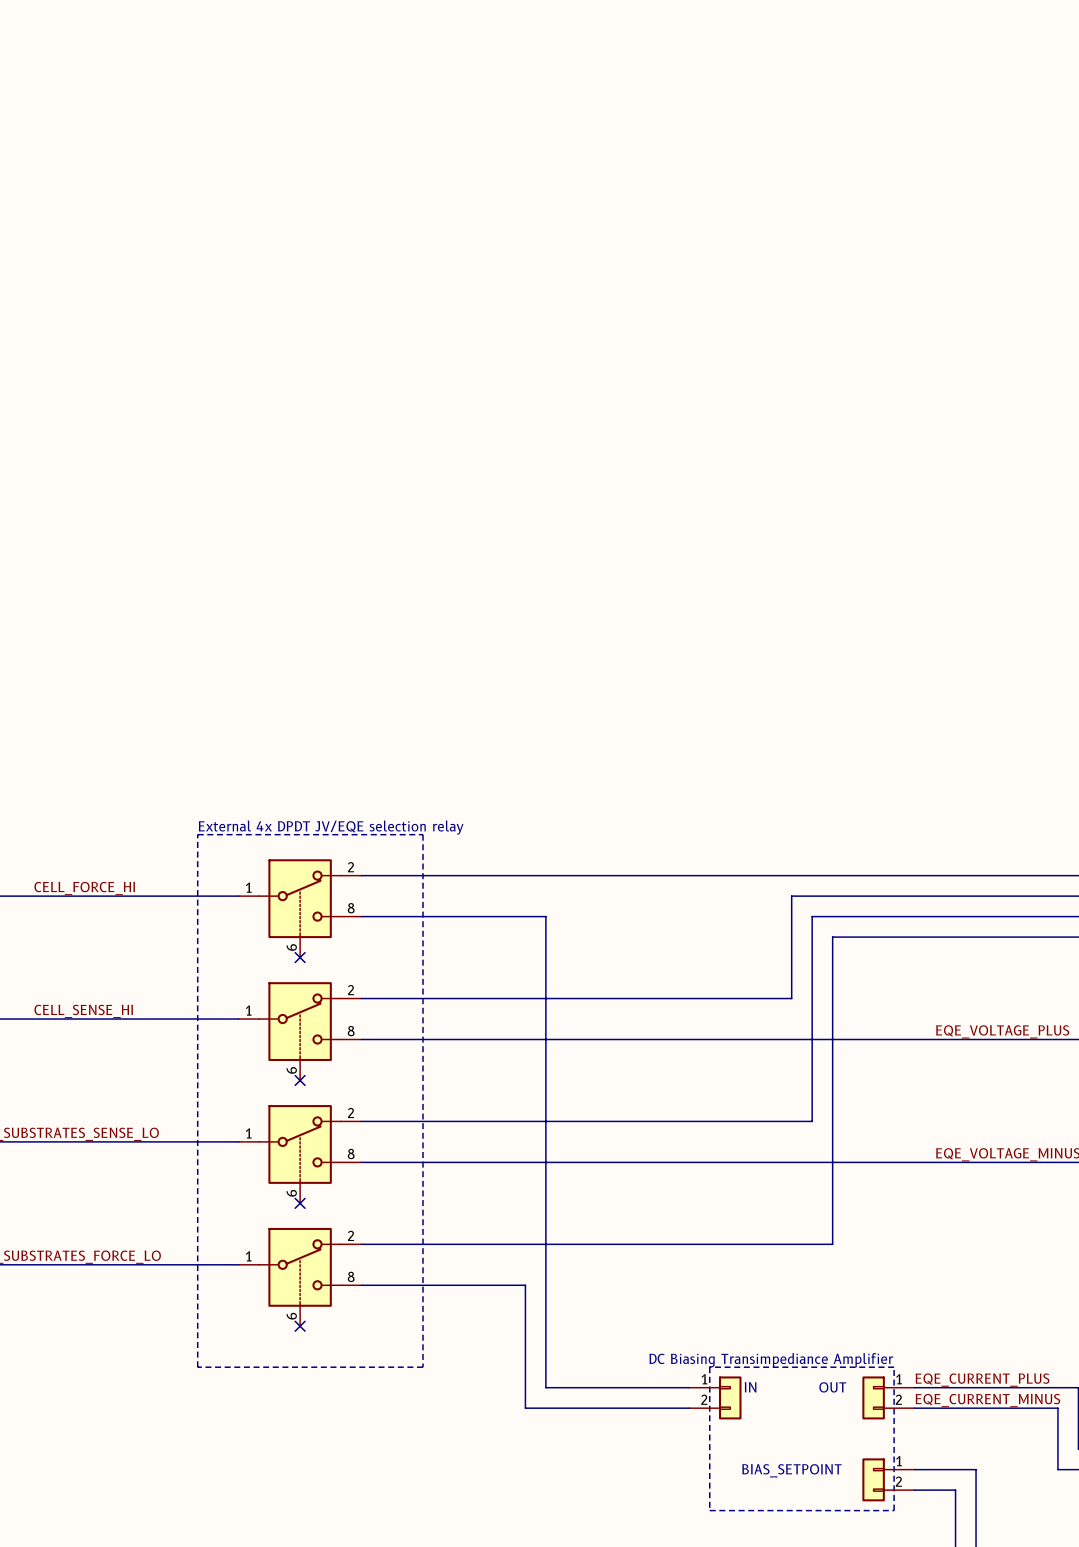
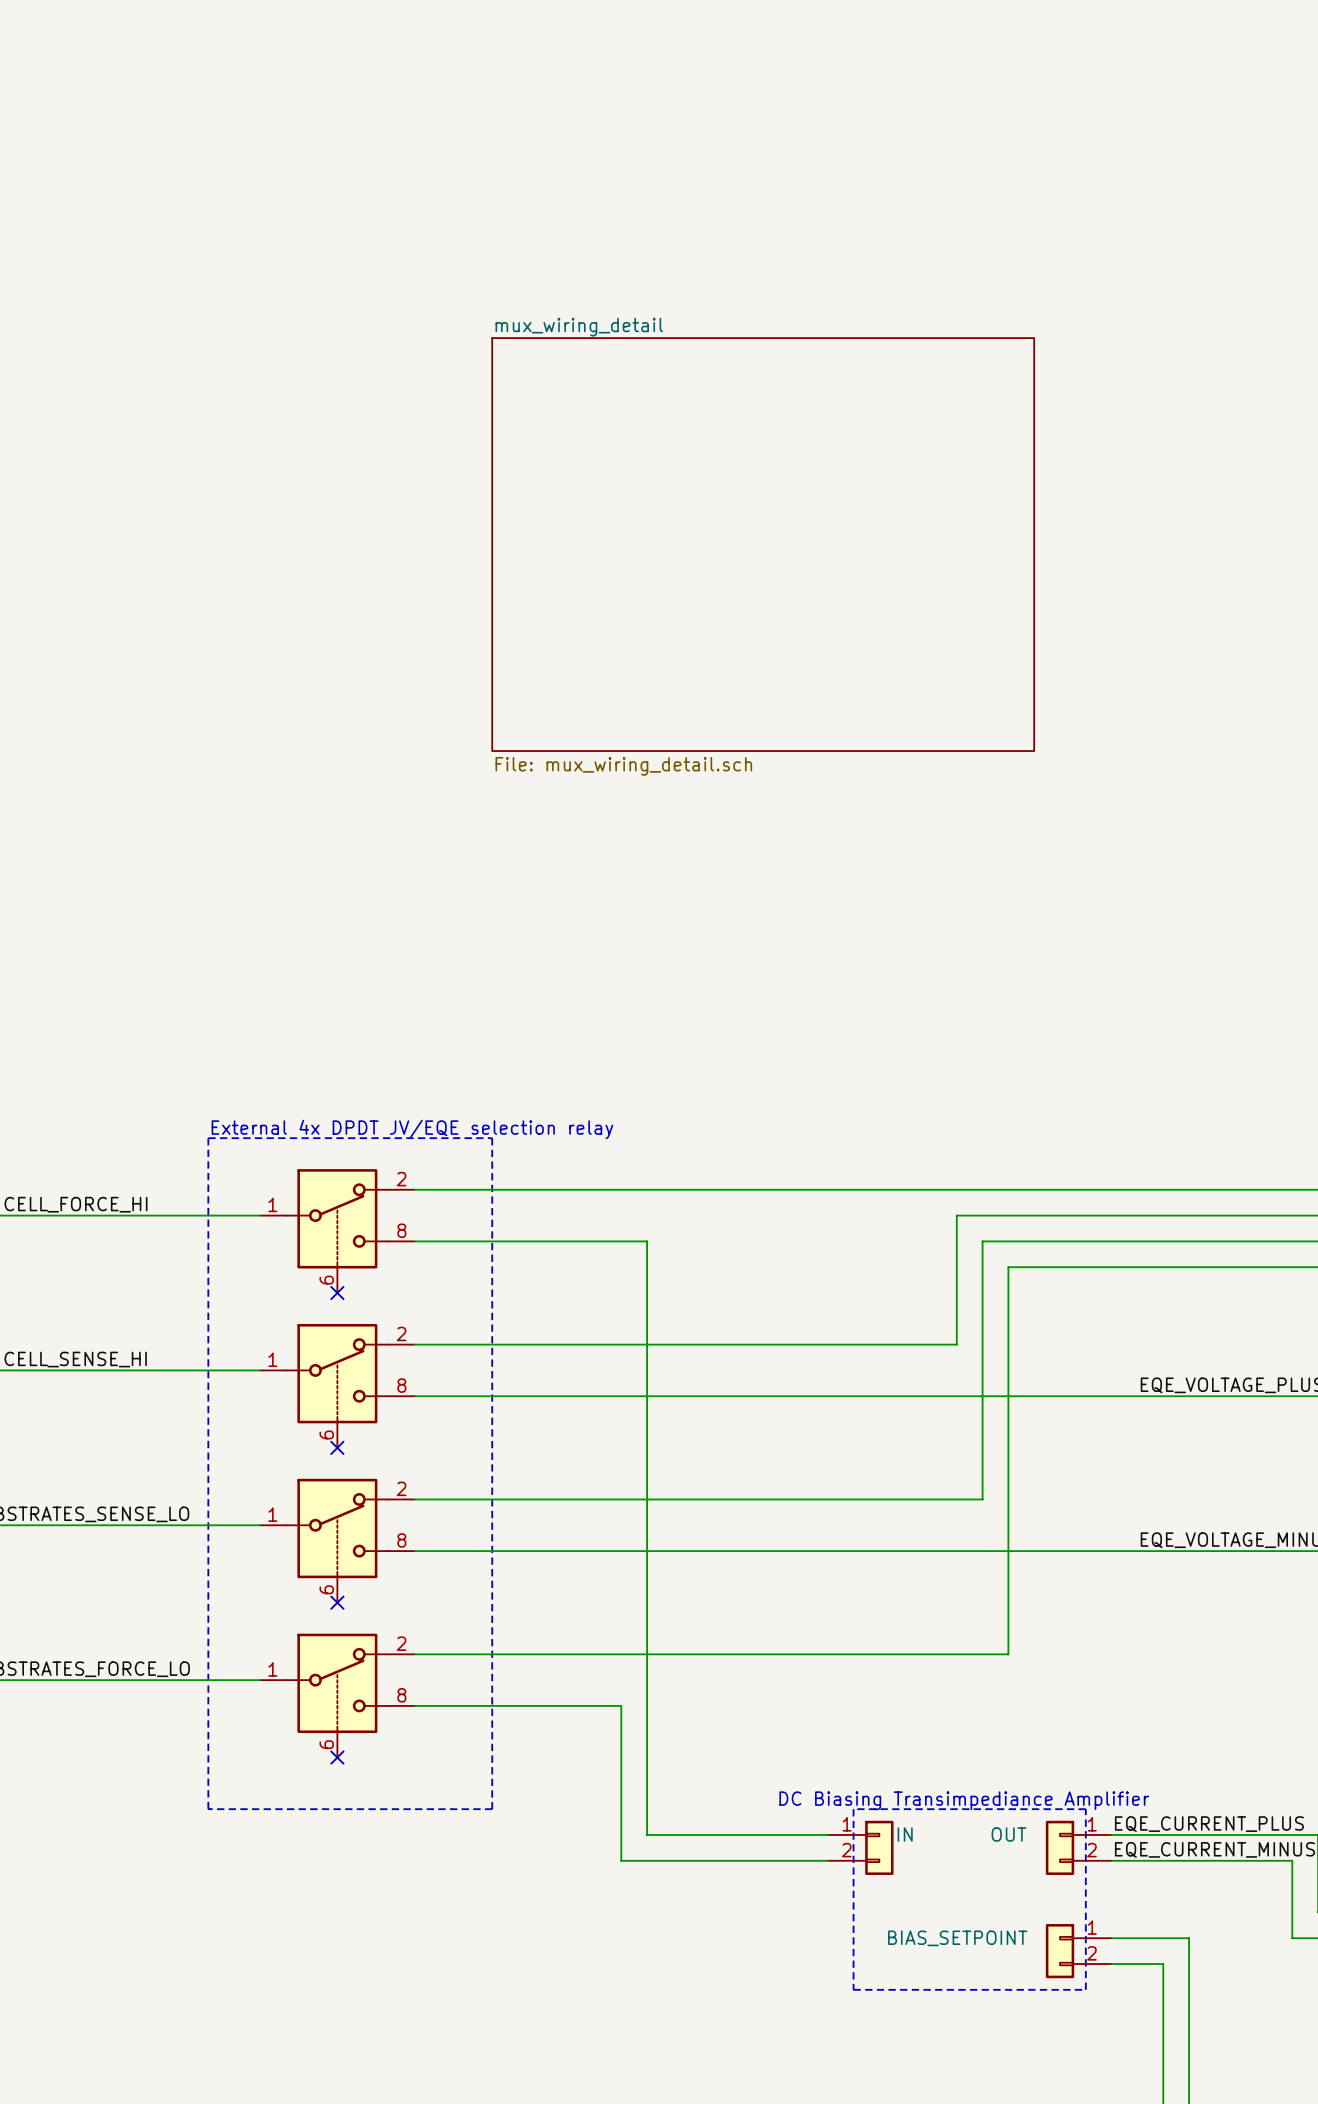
sheet mux_wiring_detail: none -> File: mux_wiring_detail.sch (763, 544)

